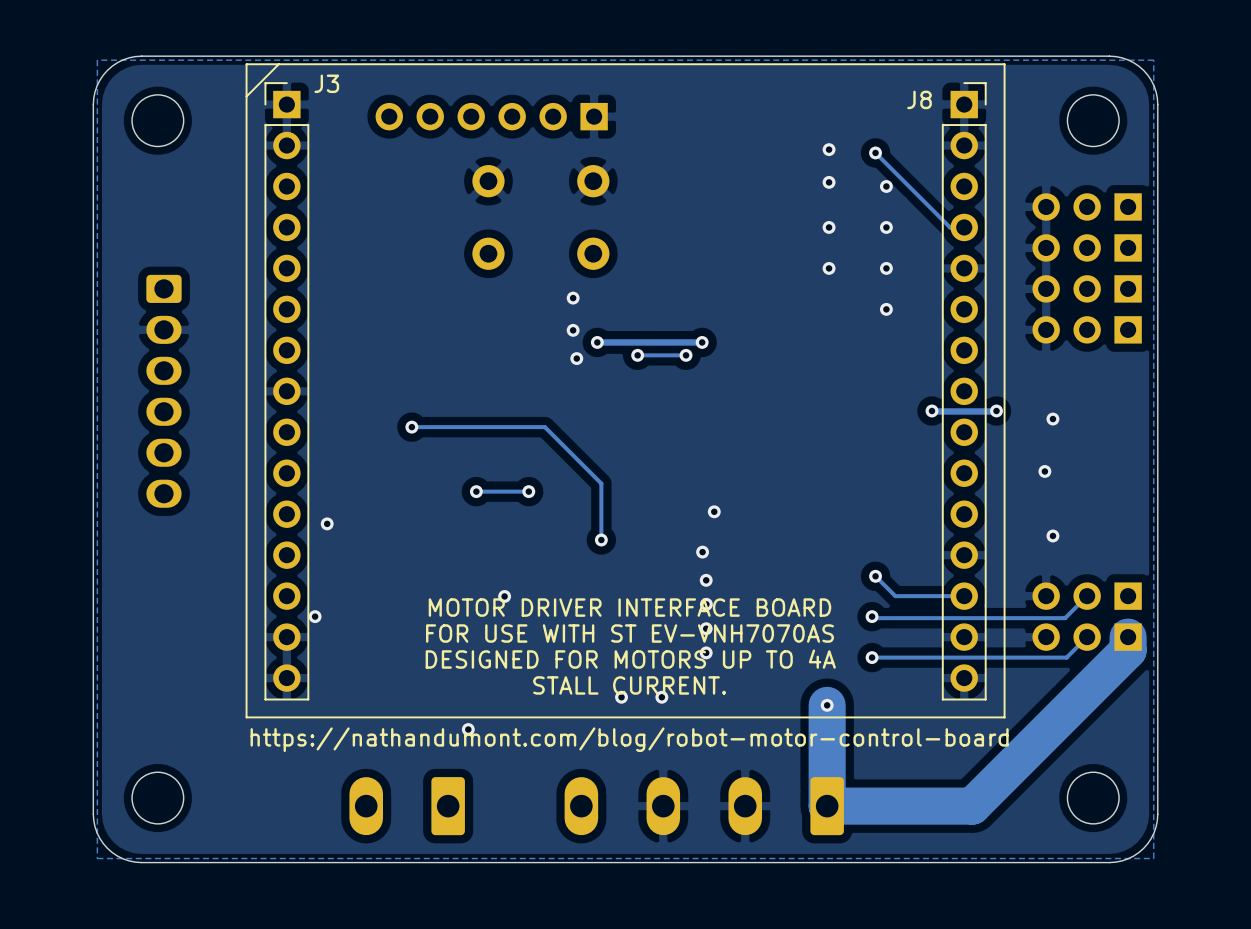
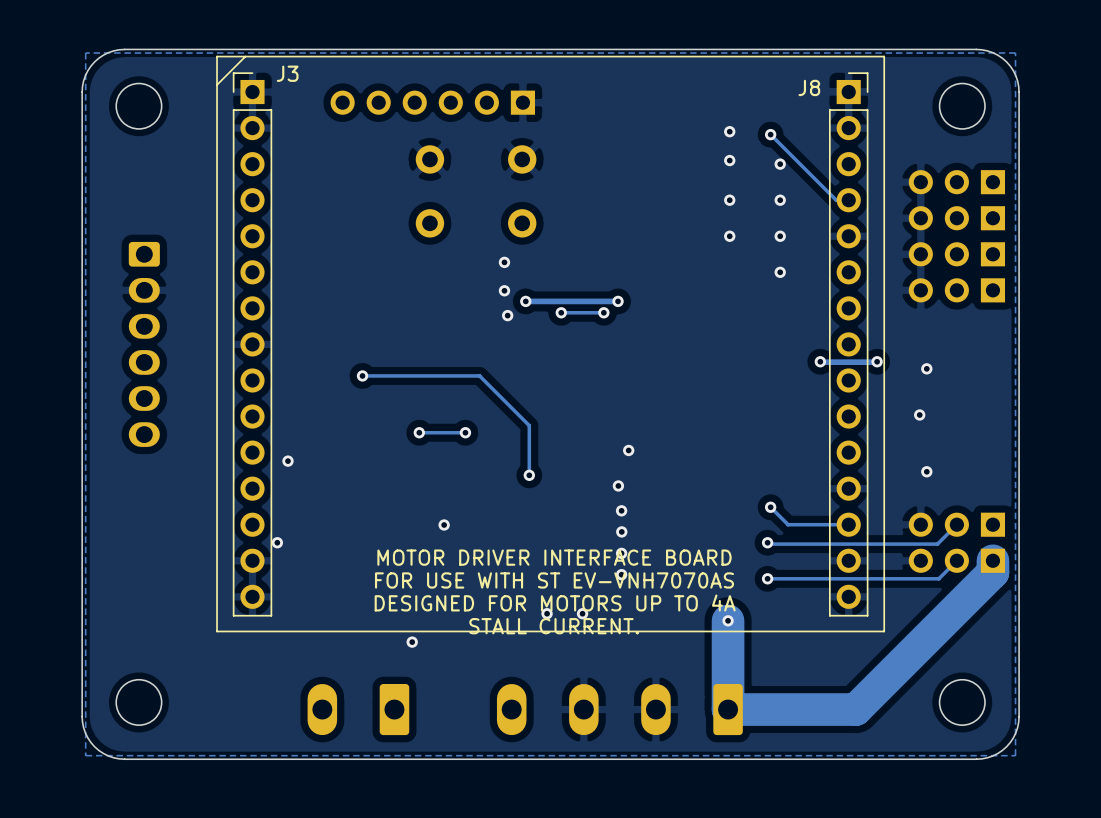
text: MOTOR DRIVER INTERFACE BOARD (629, 607) -> none
text: FOR USE WITH ST EV-VNH7070AS (629, 633) -> MOTOR DRIVER INTERFACE BOARD (554, 557)
text: DESIGNED FOR MOTORS UP TO 4A (630, 659) -> FOR USE WITH ST EV-VNH7070AS (554, 580)
text: STALL CURRENT. (629, 685) -> DESIGNED FOR MOTORS UP TO 4A (555, 602)
text: none -> STALL CURRENT. (554, 626)
text: https://nathandumont.com/blog/robot-motor-control-board (629, 739) -> none

